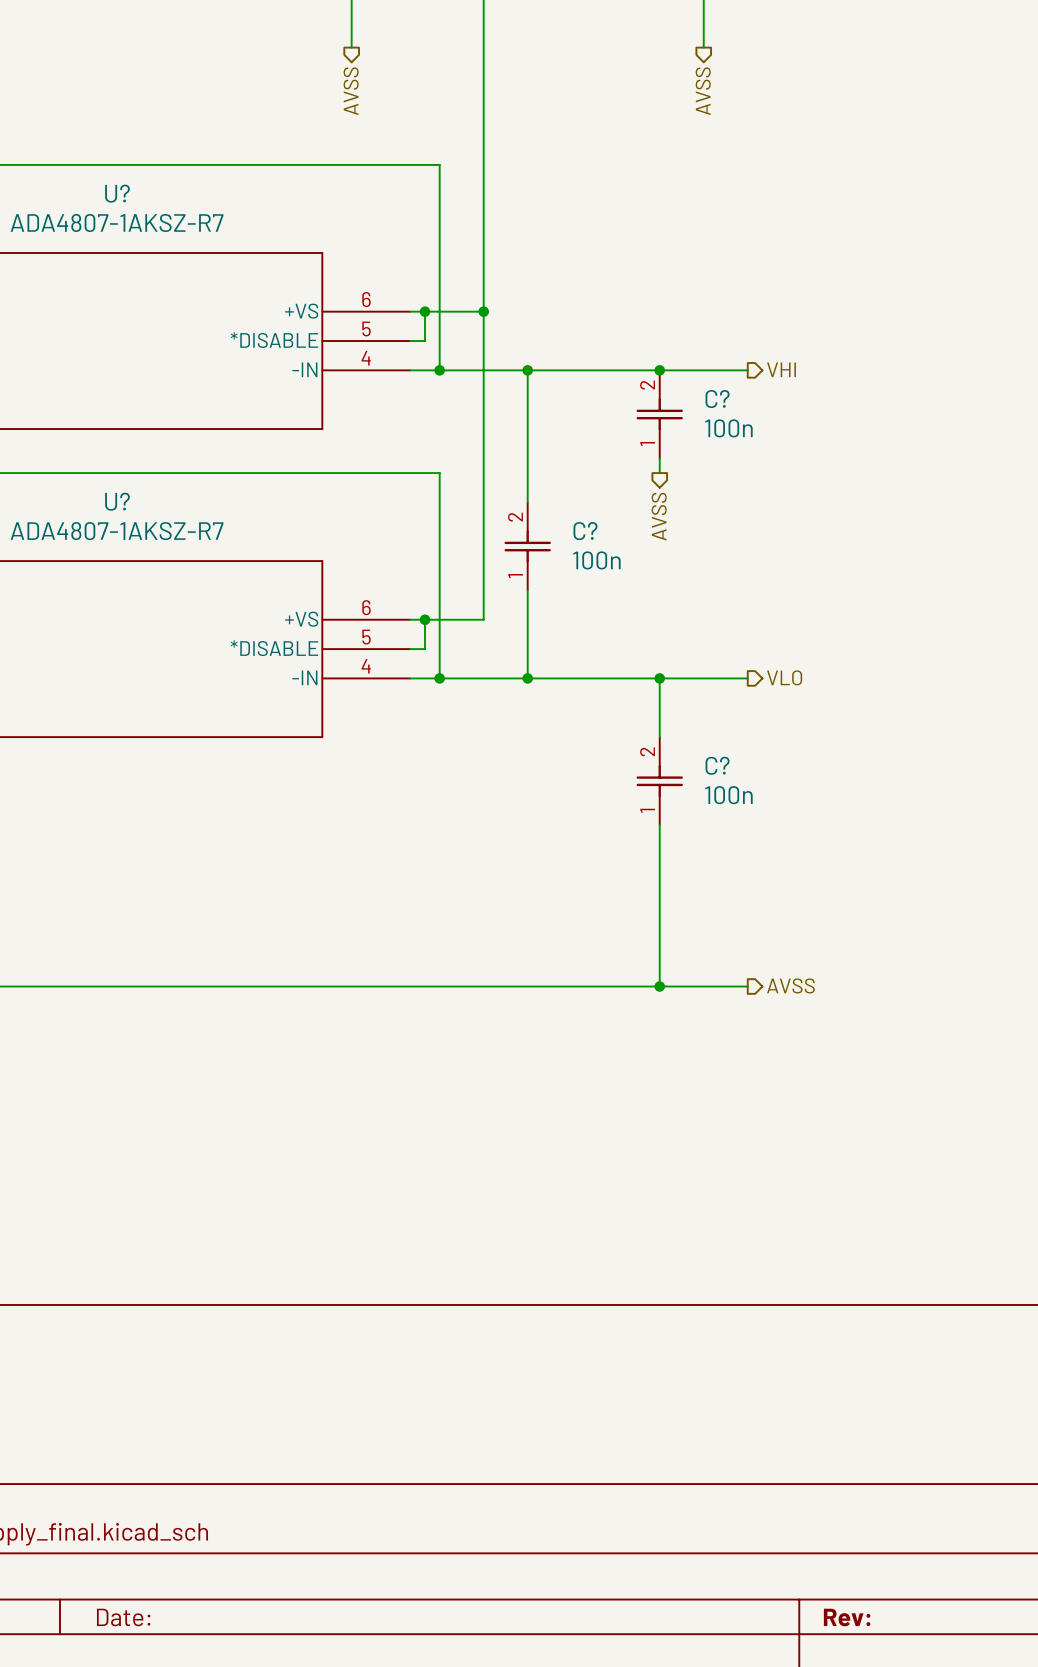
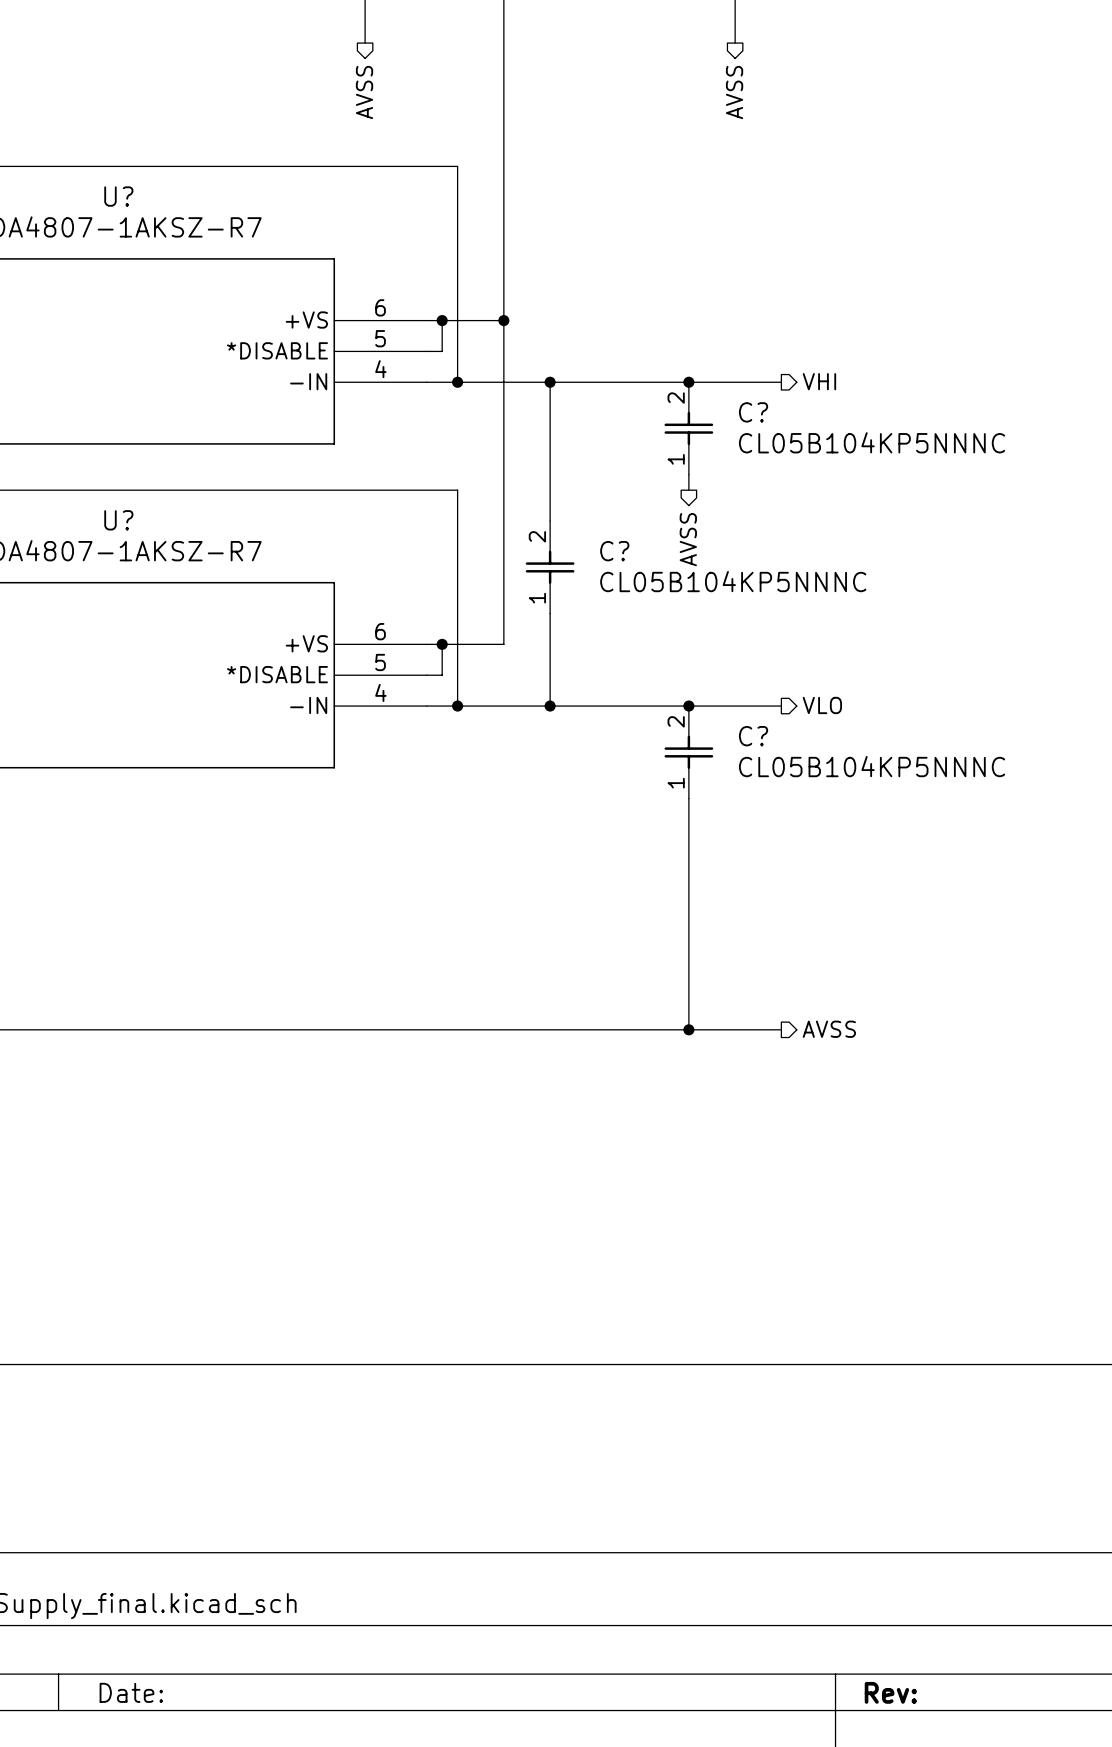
C? value: 100n (728, 428) -> CL05B104KP5NNNC (872, 442)
C? value: 100n (596, 560) -> CL05B104KP5NNNC (733, 581)
C?: none -> CL05B104KP5NNNC (688, 752)
C?: 100n (659, 781) -> none

